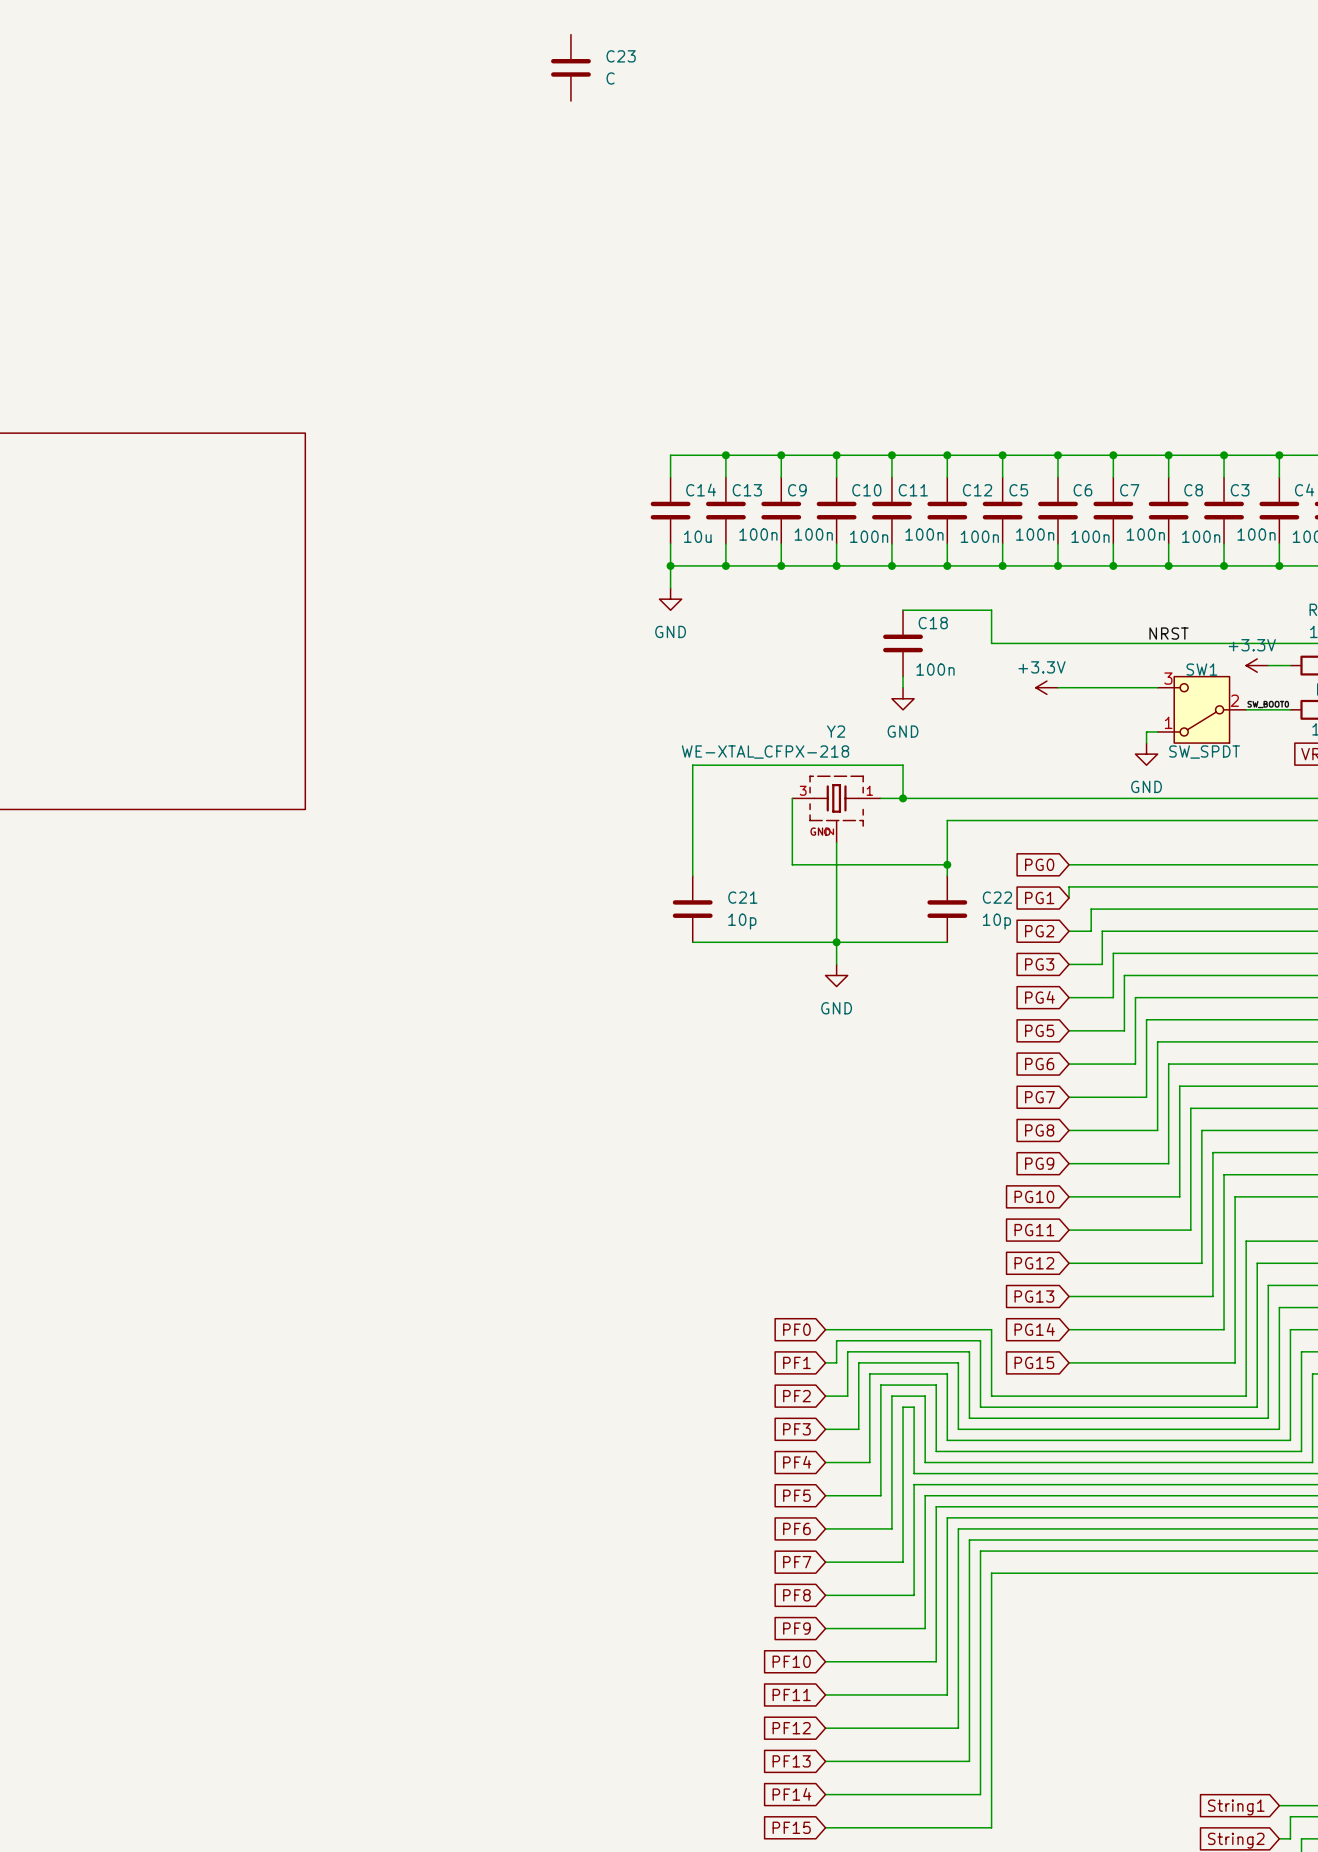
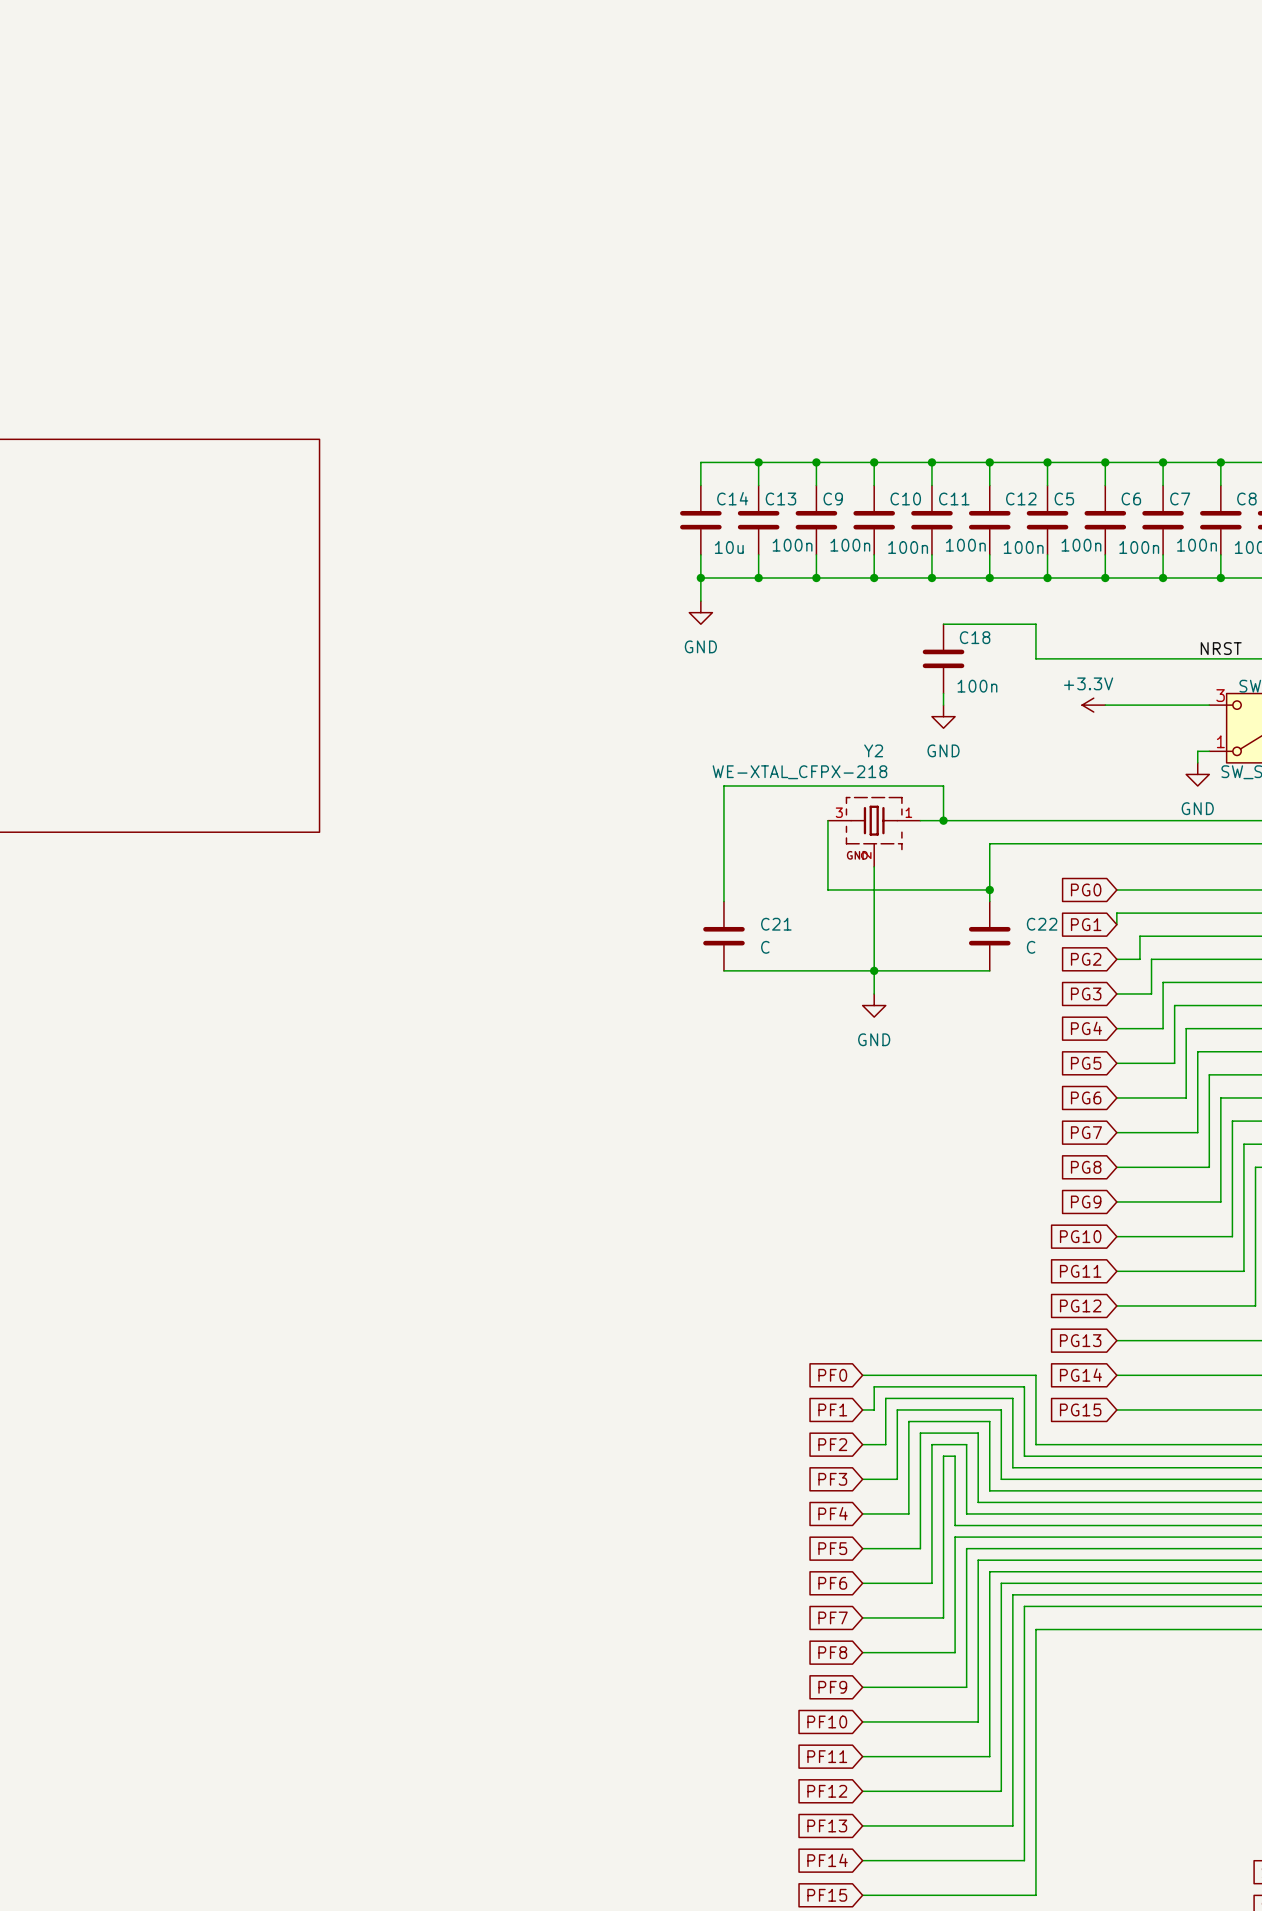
C23: C (570, 67) -> none
C21 value: 10p (742, 921) -> C (765, 947)
C22 value: 10p (996, 921) -> C (1031, 947)

